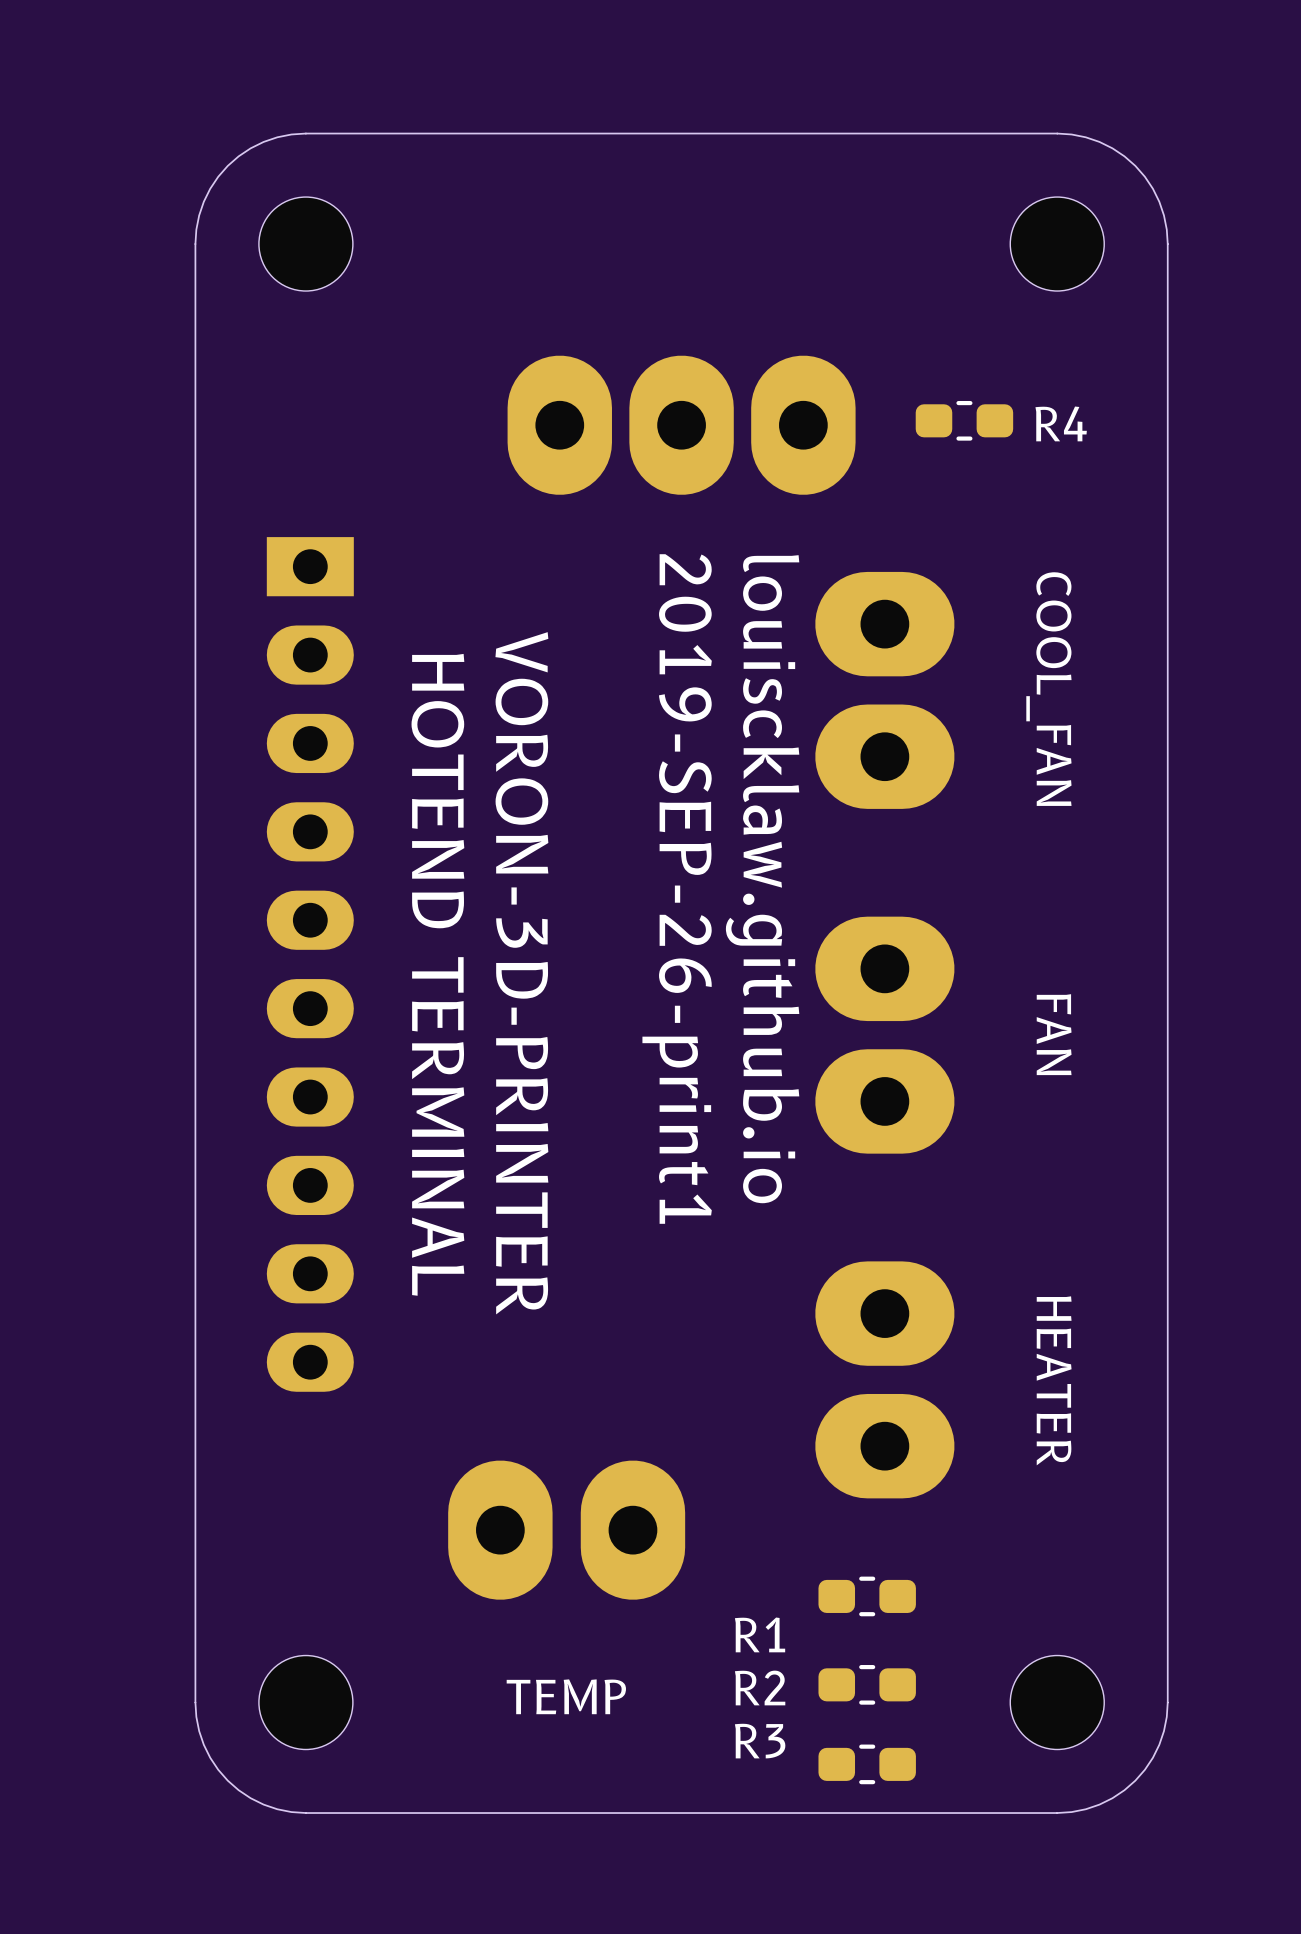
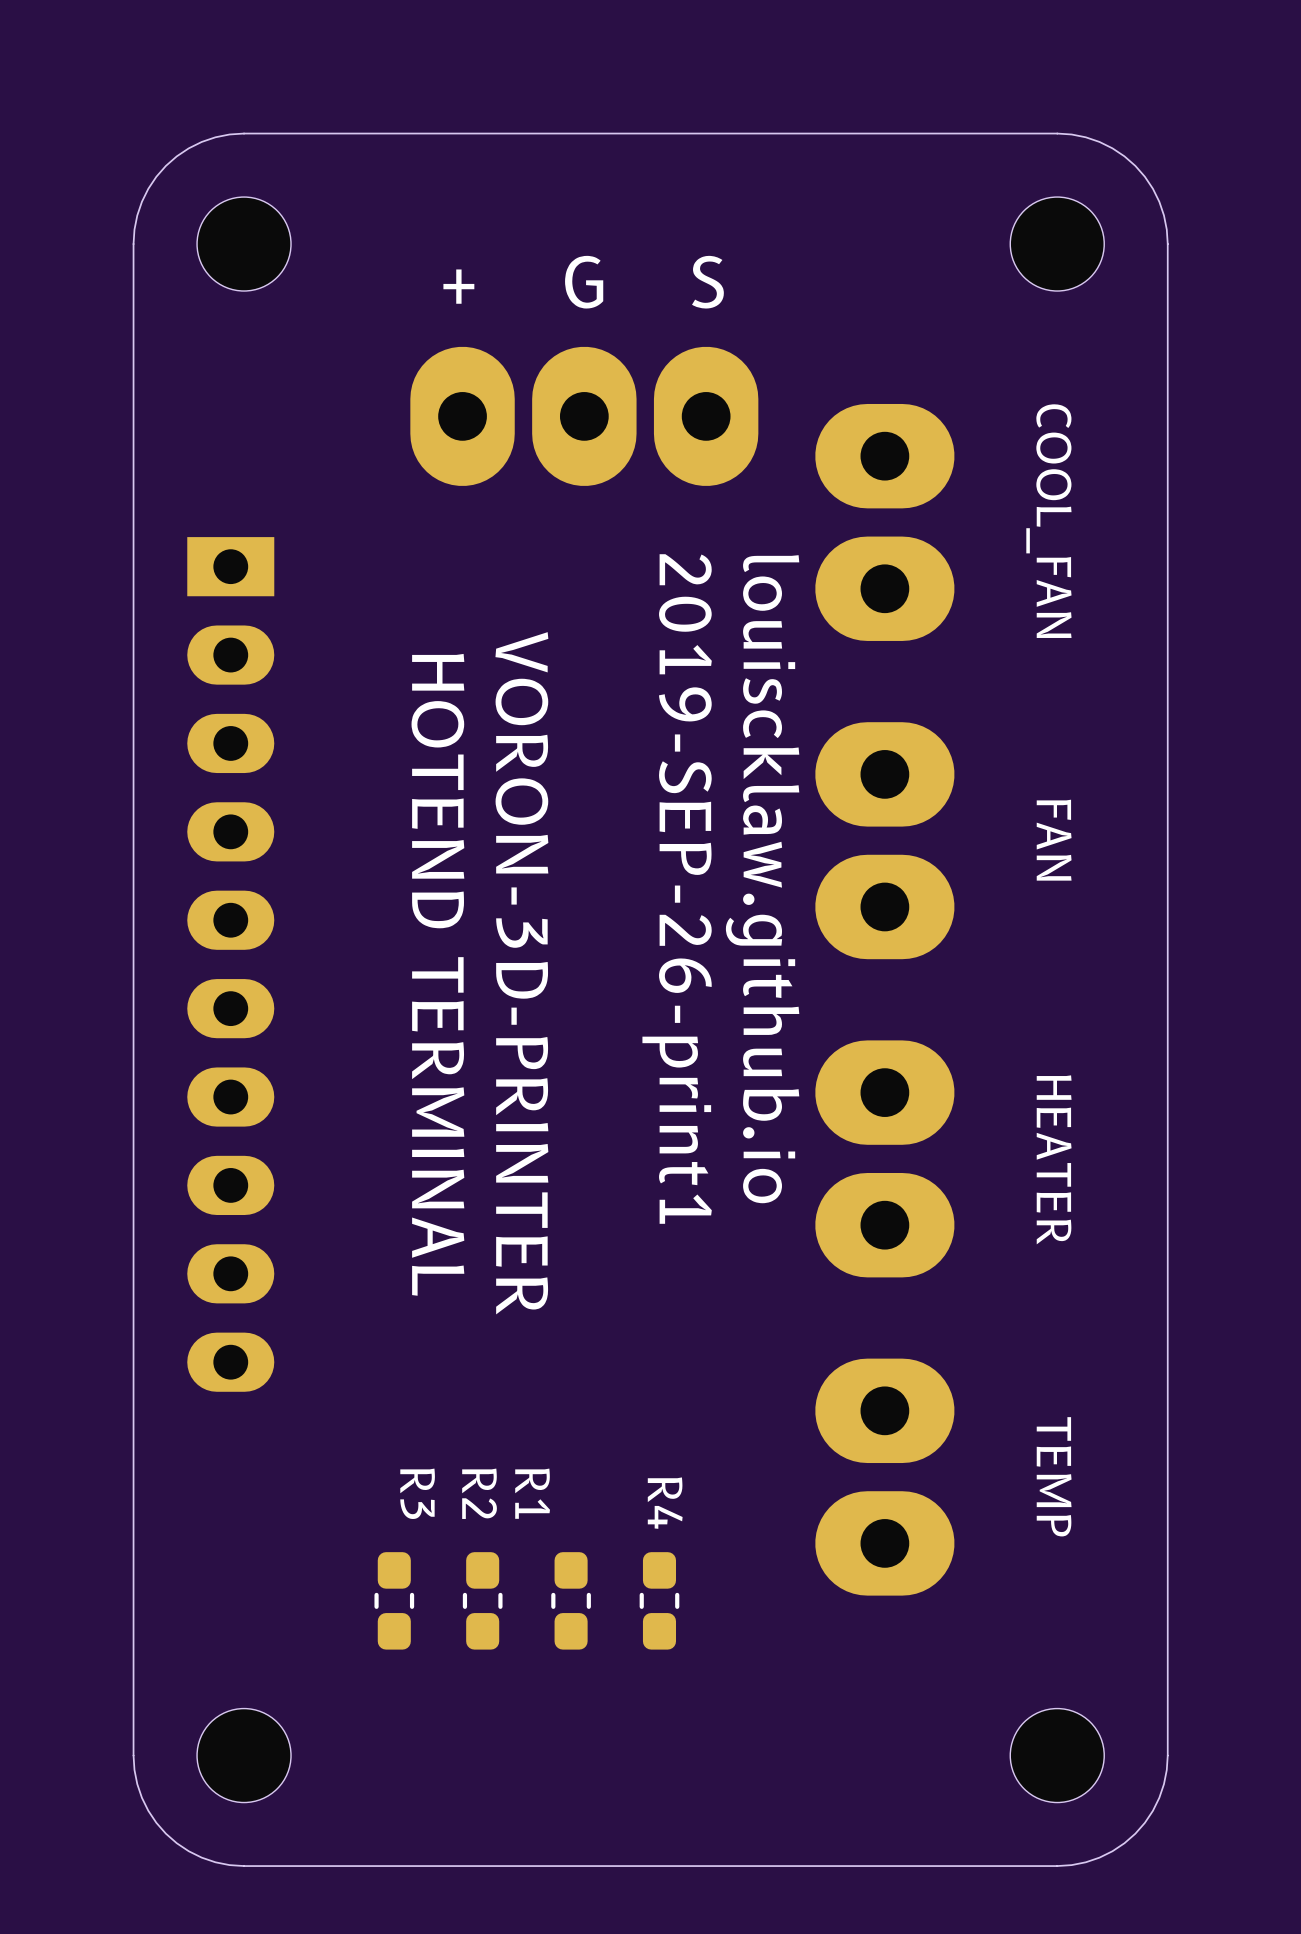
board edge: (305, 133) (277, 137) (263, 141) (238, 156) (227, 165) (218, 176) (203, 201) (199, 215) (195, 244) (195, 1702) (199, 1731) (210, 1757) (227, 1780) (250, 1798) (277, 1809) (305, 1813) (1057, 1813) (1085, 1809) (1099, 1804) (1124, 1790) (1135, 1780) (1144, 1769) (1159, 1744) (1163, 1731) (1167, 1702) -> (305, 133) (229, 134) (215, 137) (188, 148) (165, 165) (156, 176) (141, 201) (134, 229) (133, 1755) (137, 1784) (148, 1810) (165, 1833) (188, 1851) (215, 1862) (244, 1866) (1071, 1865) (1099, 1857) (1124, 1843) (1144, 1822) (1152, 1810) (1163, 1784) (1166, 1769) (1167, 1702)
part position: (305, 244) -> (244, 244)
text: none -> G (584, 282)
text: none -> S (707, 282)
text: none -> + (458, 286)
R4 rotation: 0° (964, 420) -> 90° clockwise (659, 1600)
R4 position: (964, 420) -> (659, 1600)
R4 name position: R4 (1061, 423) -> R4 (665, 1503)
part position: (681, 425) -> (584, 416)
part position: (884, 690) -> (884, 522)
part position: (310, 964) -> (230, 964)
part position: (884, 1035) -> (884, 840)
part position: (884, 1379) -> (884, 1158)
part rotation: 0° (566, 1530) -> 90° clockwise (884, 1477)
part position: (566, 1530) -> (884, 1477)
R1 rotation: 0° (867, 1596) -> 90° clockwise (571, 1600)
R1 position: (867, 1596) -> (571, 1600)
R2 rotation: 0° (867, 1684) -> 90° clockwise (482, 1600)
R2 position: (867, 1684) -> (482, 1600)
part value position: TEMP (566, 1696) -> TEMP (1054, 1476)
part position: (305, 1702) -> (244, 1755)
part position: (1057, 1702) -> (1057, 1755)
R3 rotation: 0° (867, 1764) -> 90° clockwise (394, 1600)
R3 position: (867, 1764) -> (394, 1600)

